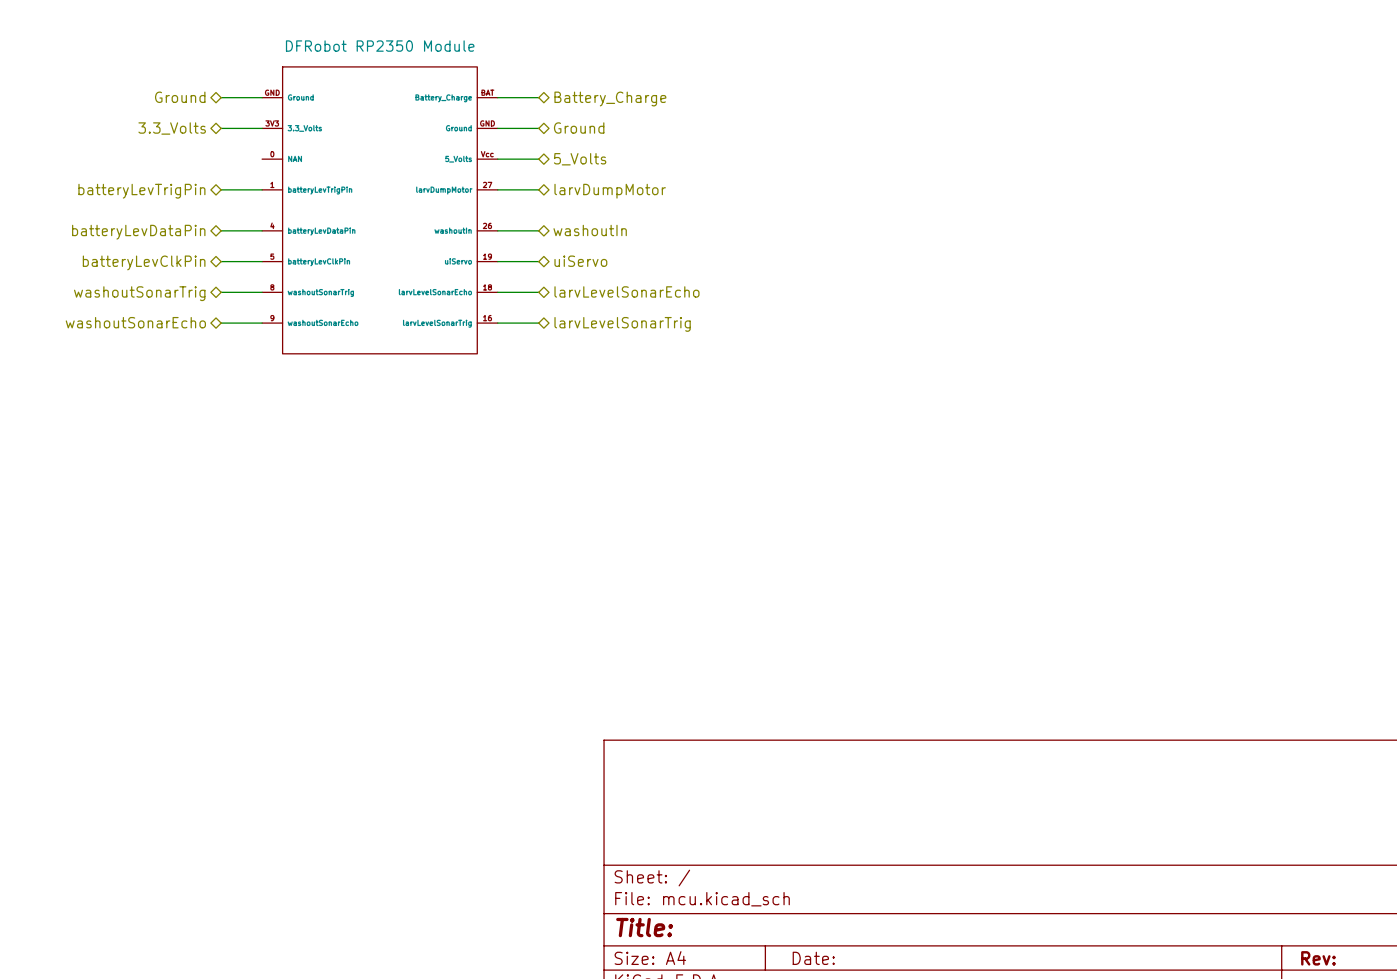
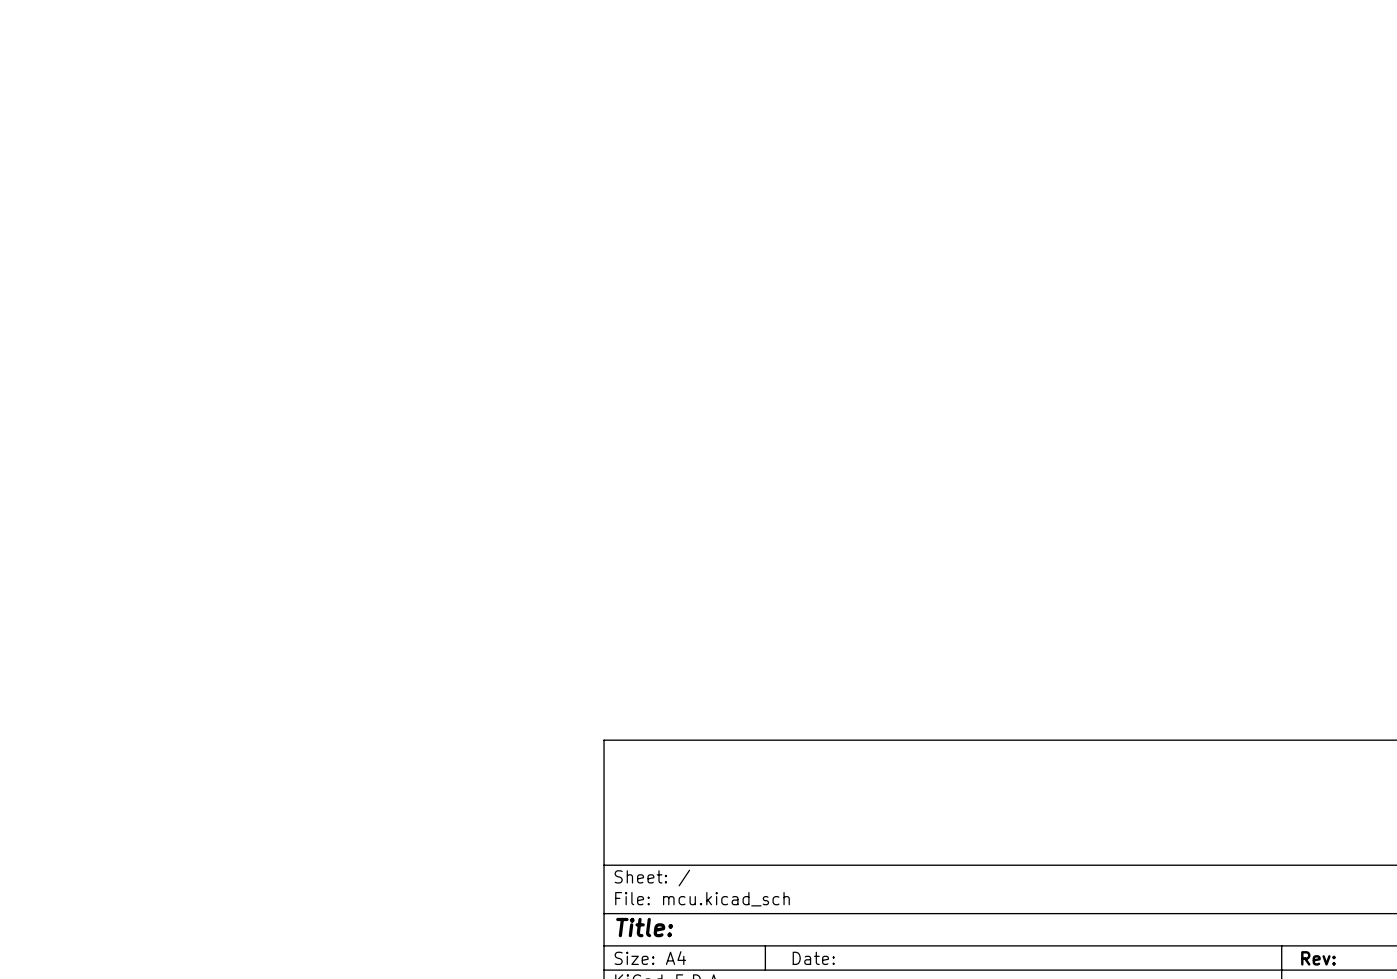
hierarchical label: Ground (180, 97) -> none
wire: (221, 97) (262, 97) -> none
wire: (497, 97) (538, 97) -> none
hierarchical label: Battery_Charge (610, 98) -> none
hierarchical label: 3.3_Volts (172, 128) -> none
wire: (221, 128) (262, 128) -> none
wire: (497, 128) (538, 128) -> none
hierarchical label: Ground (579, 128) -> none
wire: (497, 159) (538, 159) -> none
hierarchical label: 5_Volts (580, 159) -> none
wire: (221, 189) (262, 189) -> none
wire: (497, 189) (538, 189) -> none
hierarchical label: batteryLevTrigPin (141, 191) -> none
hierarchical label: larvDumpMotor (610, 191) -> none
part: DFRobot RP2350 Module (379, 210) -> none
wire: (221, 230) (262, 230) -> none
wire: (497, 230) (538, 230) -> none
hierarchical label: washoutIn (590, 230) -> none
hierarchical label: batteryLevDataPin (138, 232) -> none
wire: (221, 261) (262, 261) -> none
wire: (497, 261) (538, 261) -> none
hierarchical label: uiServo (580, 261) -> none
hierarchical label: batteryLevClkPin (144, 262) -> none
hierarchical label: larvLevelSonarEcho (626, 291) -> none
wire: (221, 292) (262, 292) -> none
wire: (497, 292) (538, 292) -> none
hierarchical label: washoutSonarTrig (139, 293) -> none
hierarchical label: washoutSonarEcho (135, 322) -> none
wire: (221, 323) (262, 323) -> none
wire: (497, 323) (538, 323) -> none
hierarchical label: larvLevelSonarTrig (622, 324) -> none

